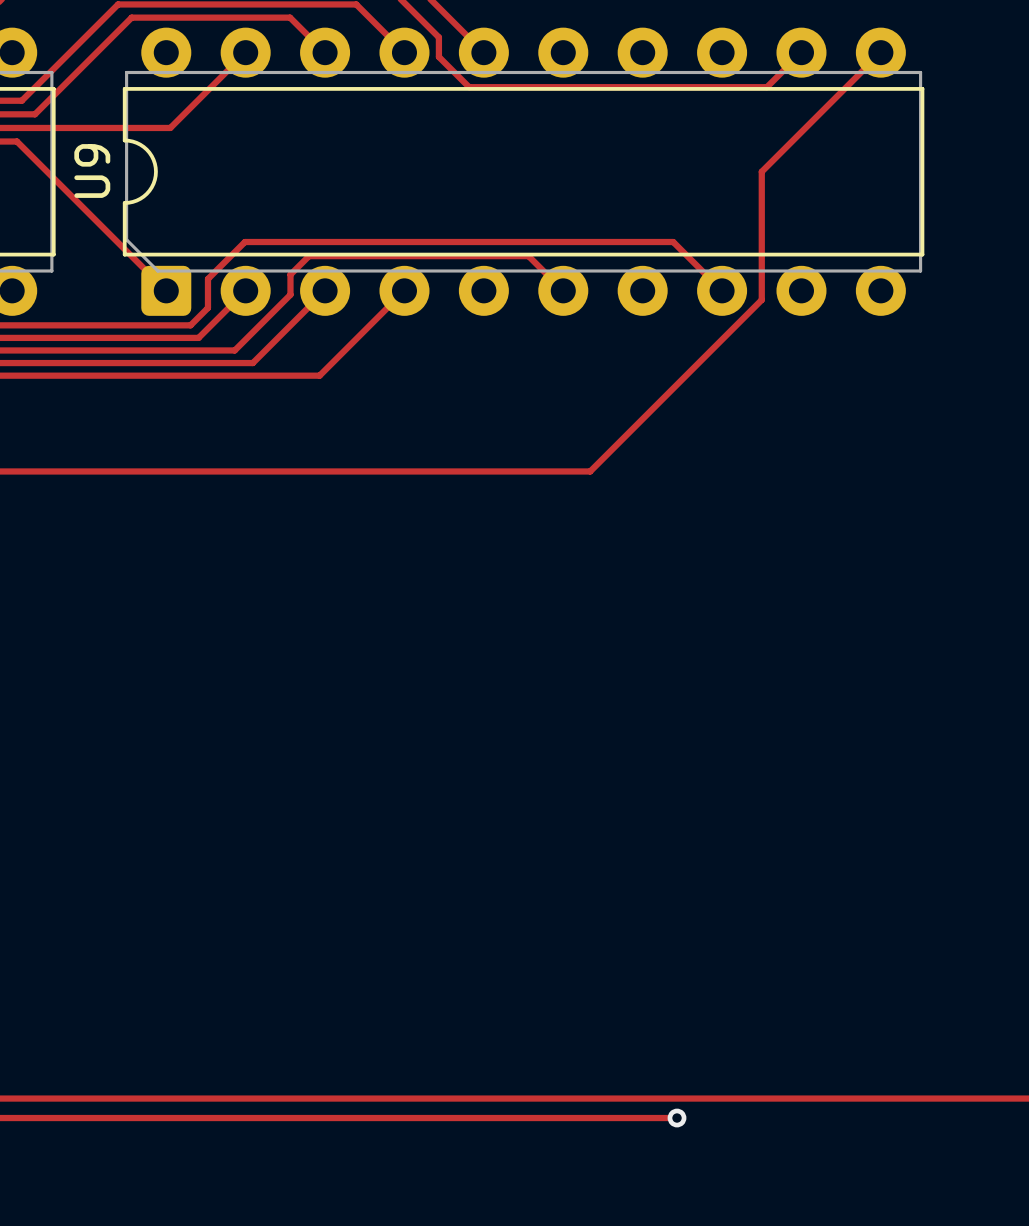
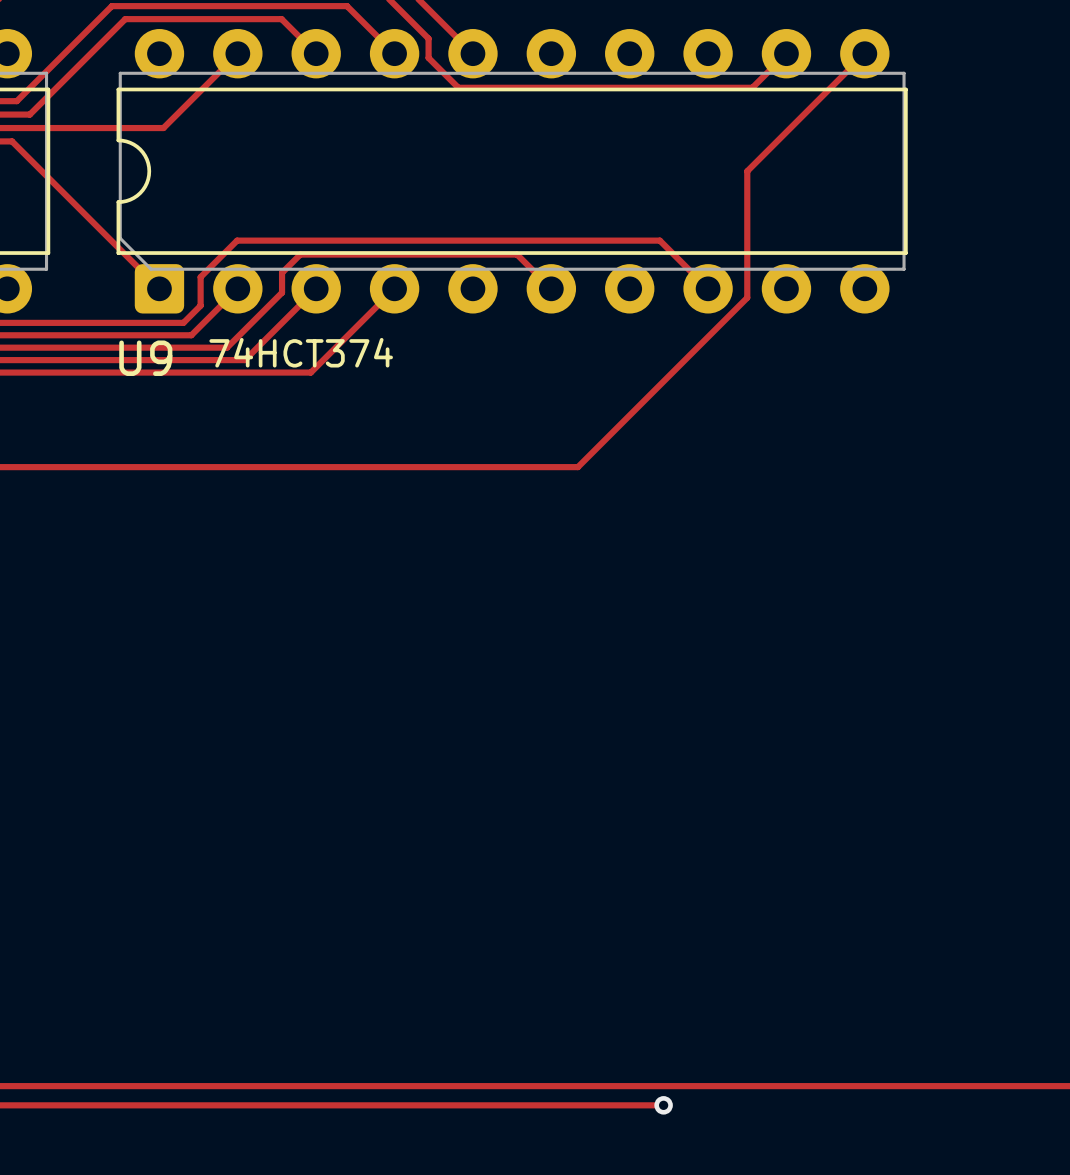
U9 name rotation: 0° (92, 171) -> 90° clockwise (145, 358)
U9 name position: U9 (92, 171) -> U9 (145, 358)
text: none -> 74HCT374 (301, 352)

